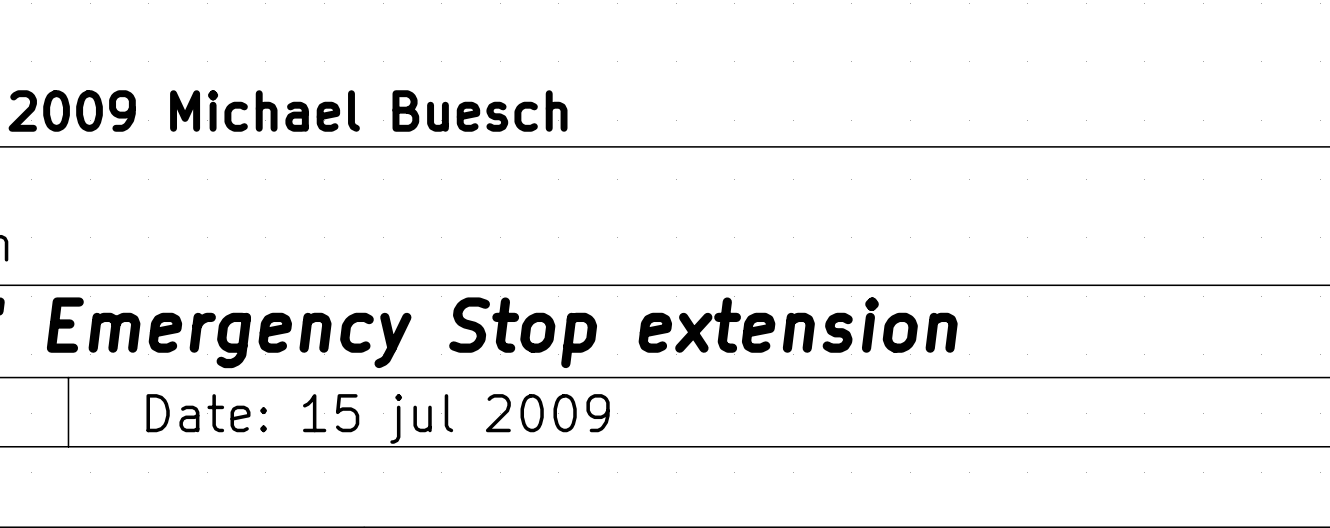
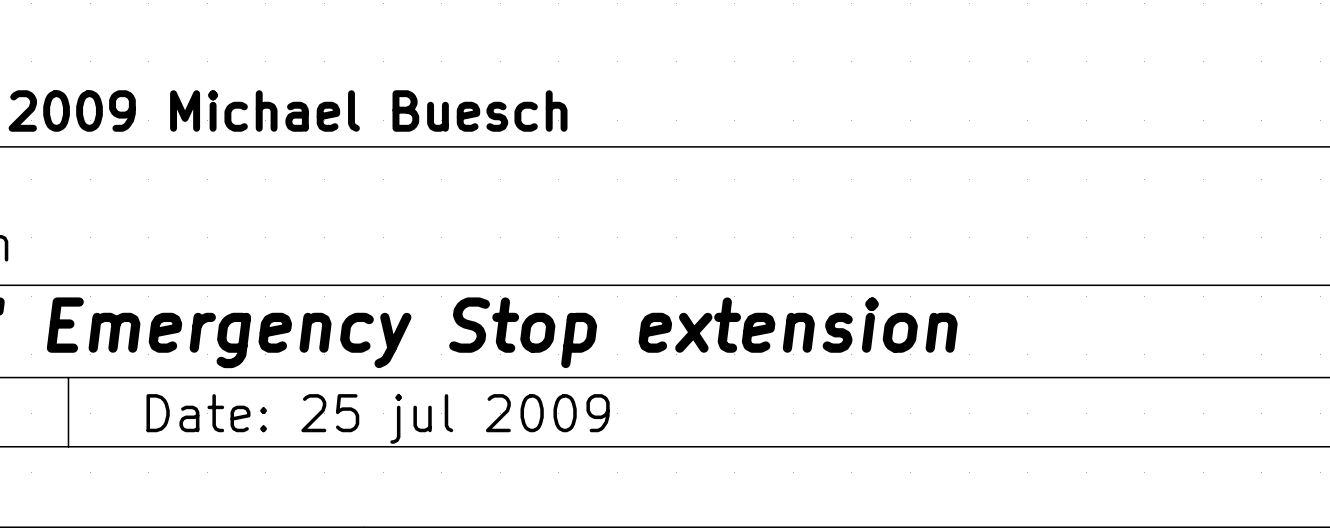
title block: Date: 15 jul 2009 (378, 418) -> Date: 25 jul 2009 (378, 418)

